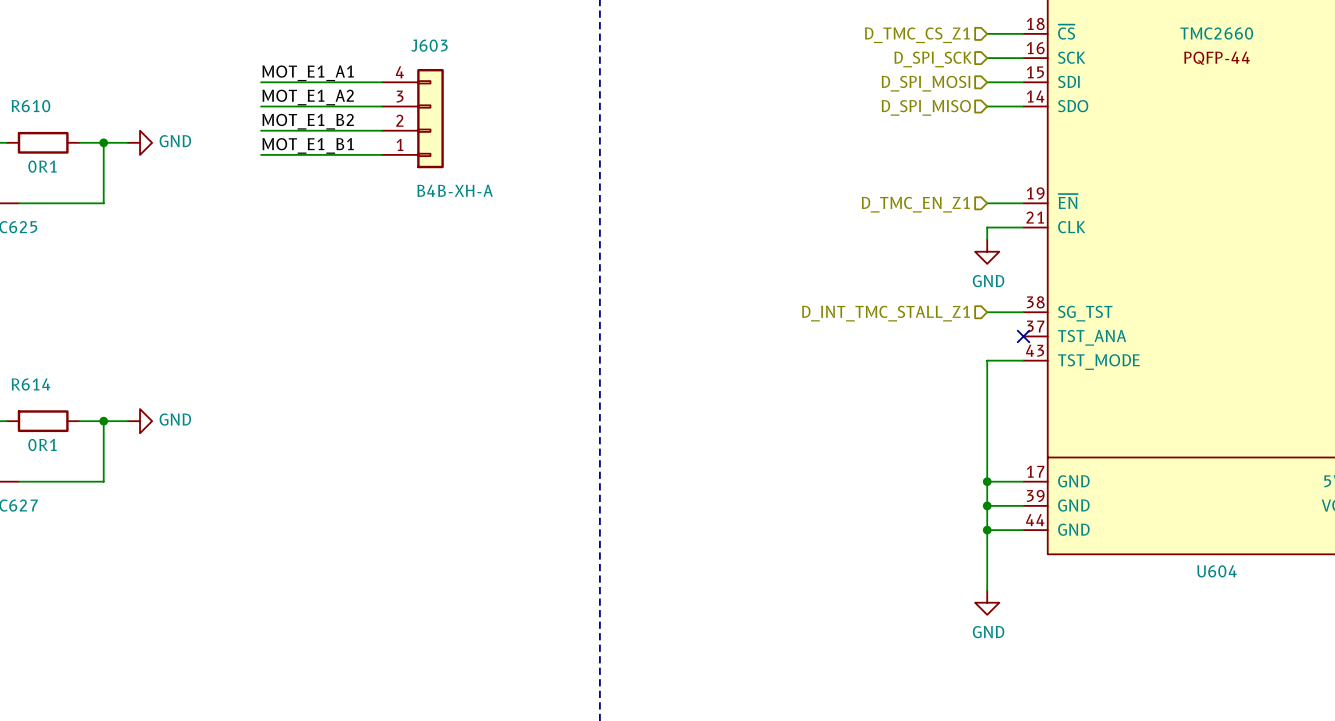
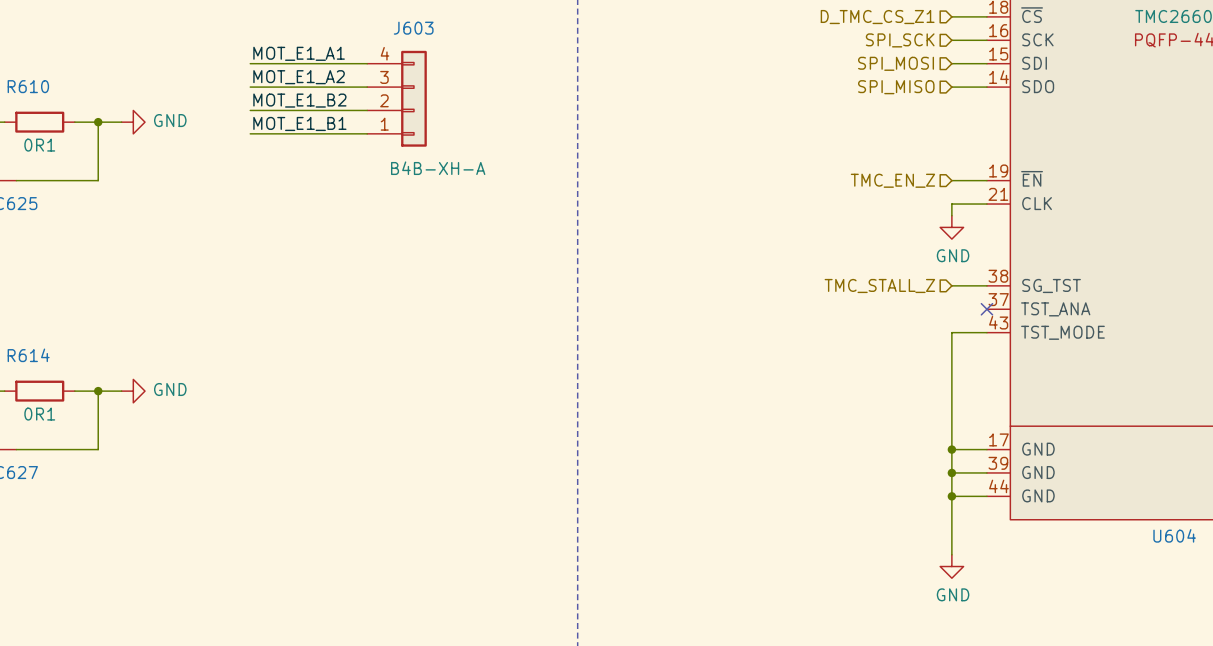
hierarchical label: D_SPI_SCK (933, 59) -> SPI_SCK (900, 40)
hierarchical label: D_SPI_MOSI (925, 83) -> SPI_MOSI (896, 63)
hierarchical label: D_SPI_MISO (926, 107) -> SPI_MISO (896, 87)
hierarchical label: D_TMC_EN_Z1 (915, 204) -> TMC_EN_Z (892, 180)
hierarchical label: D_INT_TMC_STALL_Z1 (885, 313) -> TMC_STALL_Z (879, 285)

